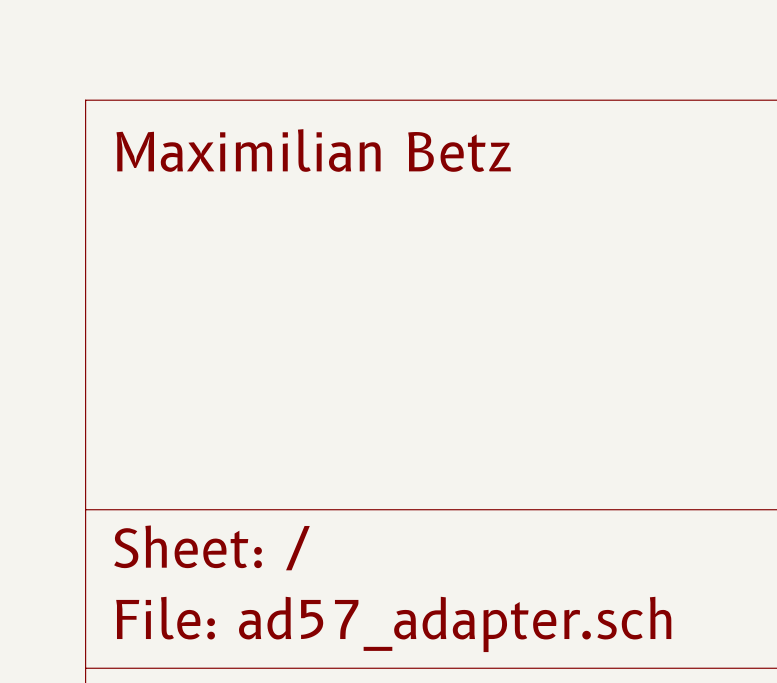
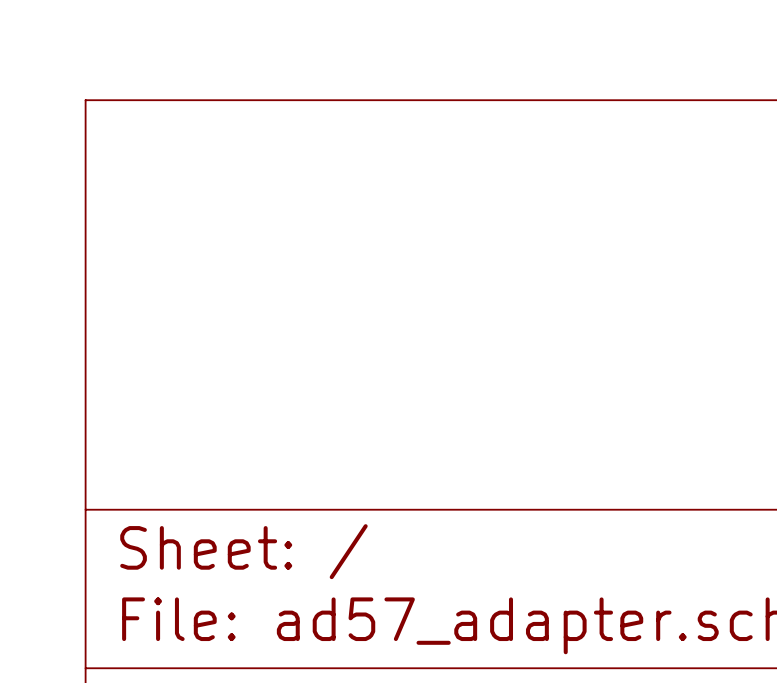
title block: Maximilian Betz (313, 150) -> none

